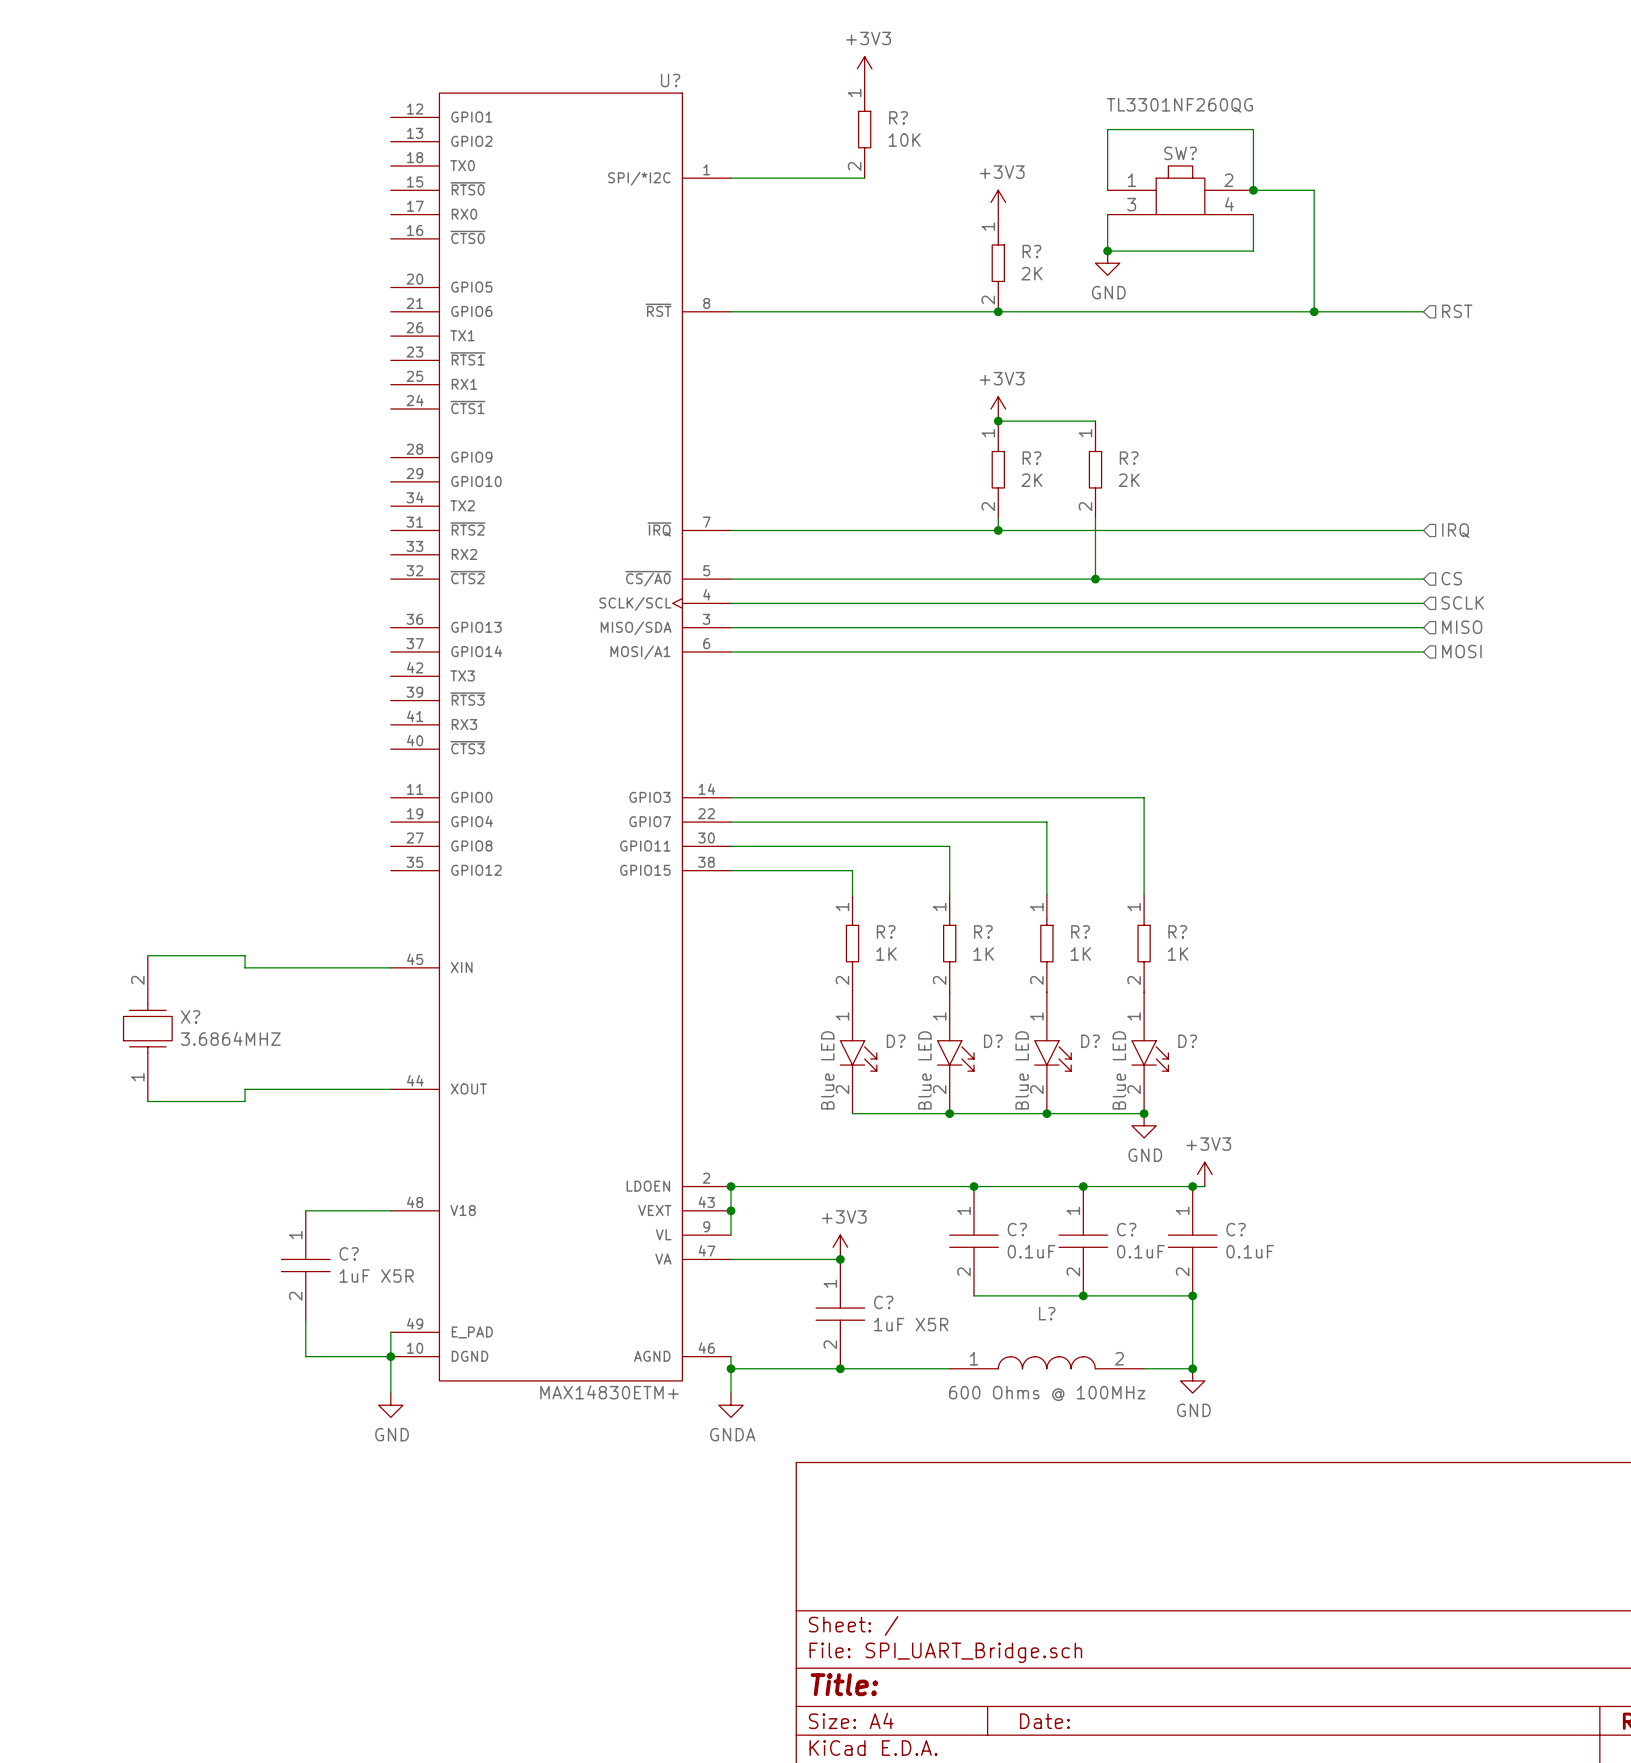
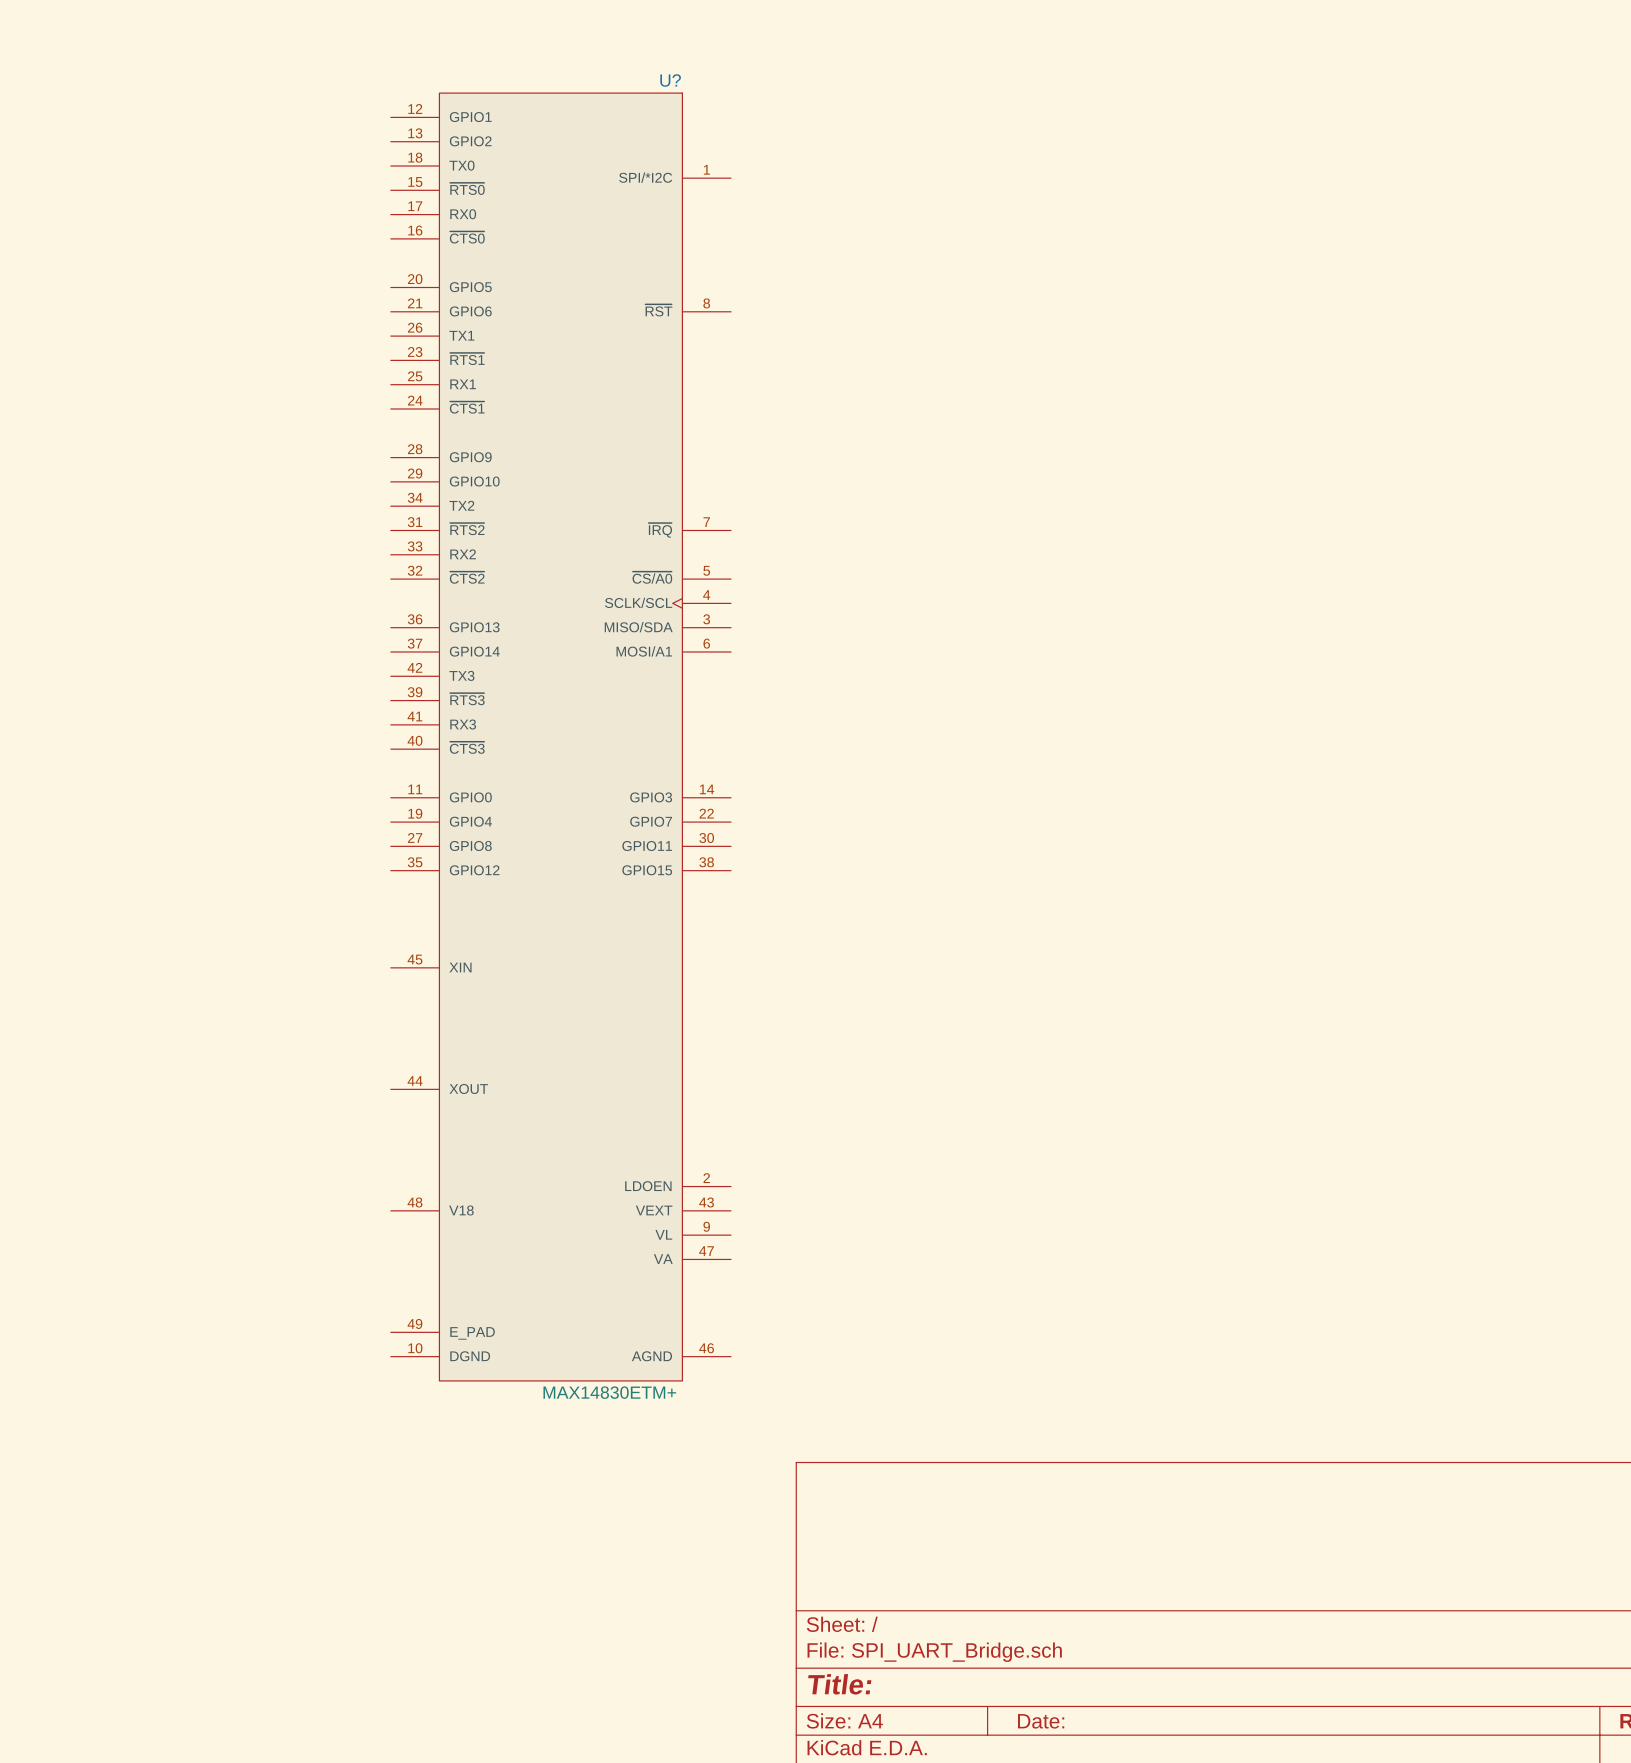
power symbol: +3V3 (864, 68) -> none
R?: (864, 129) -> none
wire: (731, 178) (864, 178) -> none
wire: (1107, 190) (1107, 129) (1253, 129) (1253, 190) (1314, 190) (1314, 311) -> none
SW?: TL3301NF260QG (1180, 190) -> none
junction: (1253, 190) -> none
power symbol: +3V3 (998, 202) -> none
wire: (1107, 214) (1107, 251) (1253, 251) (1253, 214) -> none
junction: (1107, 251) -> none
R?: (998, 263) -> none
power symbol: GND (1107, 263) -> none
wire: (731, 311) (1423, 311) -> none
junction: (998, 311) -> none
junction: (1314, 311) -> none
hierarchical label: RST (1457, 311) -> none
power symbol: +3V3 (998, 408) -> none
wire: (998, 421) (1095, 421) -> none
junction: (998, 421) -> none
R?: (998, 469) -> none
R?: (1095, 469) -> none
wire: (998, 518) (998, 530) -> none
wire: (1095, 518) (1095, 579) -> none
wire: (731, 530) (1423, 530) -> none
junction: (998, 530) -> none
hierarchical label: IRQ (1455, 530) -> none
hierarchical label: CS (1451, 578) -> none
wire: (731, 579) (1423, 579) -> none
junction: (1095, 579) -> none
hierarchical label: SCLK (1462, 602) -> none
wire: (731, 603) (1423, 603) -> none
wire: (731, 627) (1423, 627) -> none
hierarchical label: MISO (1462, 627) -> none
wire: (731, 651) (1423, 651) -> none
hierarchical label: MOSI (1461, 651) -> none
wire: (731, 797) (1144, 797) (1144, 894) -> none
wire: (731, 822) (1046, 822) (1046, 894) -> none
wire: (731, 846) (949, 846) (949, 894) -> none
wire: (731, 870) (852, 870) (852, 894) -> none
R?: (852, 943) -> none
R?: (949, 943) -> none
R?: (1046, 943) -> none
R?: (1144, 943) -> none
wire: (147, 955) (245, 955) (245, 967) (390, 967) -> none
X?: (147, 1028) -> none
D?: (858, 1052) -> none
D?: (955, 1052) -> none
D?: (1052, 1052) -> none
D?: (1150, 1052) -> none
wire: (390, 1089) (245, 1089) (245, 1101) (147, 1101) -> none
wire: (852, 1113) (1144, 1113) -> none
junction: (949, 1113) -> none
junction: (1046, 1113) -> none
junction: (1144, 1113) -> none
power symbol: GND (1144, 1125) -> none
power symbol: +3V3 (1204, 1174) -> none
junction: (731, 1186) -> none
junction: (973, 1186) -> none
junction: (1083, 1186) -> none
junction: (1192, 1186) -> none
wire: (1204, 1186) (731, 1186) (731, 1235) -> none
wire: (305, 1210) (390, 1210) -> none
junction: (731, 1210) -> none
C?: (973, 1241) -> none
C?: (1083, 1241) -> none
C?: (1192, 1241) -> none
power symbol: +3V3 (840, 1247) -> none
wire: (731, 1259) (840, 1259) -> none
junction: (840, 1259) -> none
C?: (305, 1265) -> none
wire: (973, 1295) (1192, 1295) (1192, 1368) (1144, 1368) -> none
junction: (1083, 1295) -> none
junction: (1192, 1295) -> none
C?: (840, 1314) -> none
wire: (305, 1320) (305, 1356) (390, 1356) -> none
wire: (390, 1332) (390, 1393) -> none
junction: (390, 1356) -> none
wire: (731, 1356) (731, 1393) -> none
L?: (1046, 1362) -> none
wire: (731, 1368) (949, 1368) -> none
junction: (731, 1368) -> none
junction: (840, 1368) -> none
junction: (1192, 1368) -> none
power symbol: GND (1192, 1380) -> none
power symbol: GND (390, 1405) -> none
power symbol: GNDA (731, 1405) -> none

